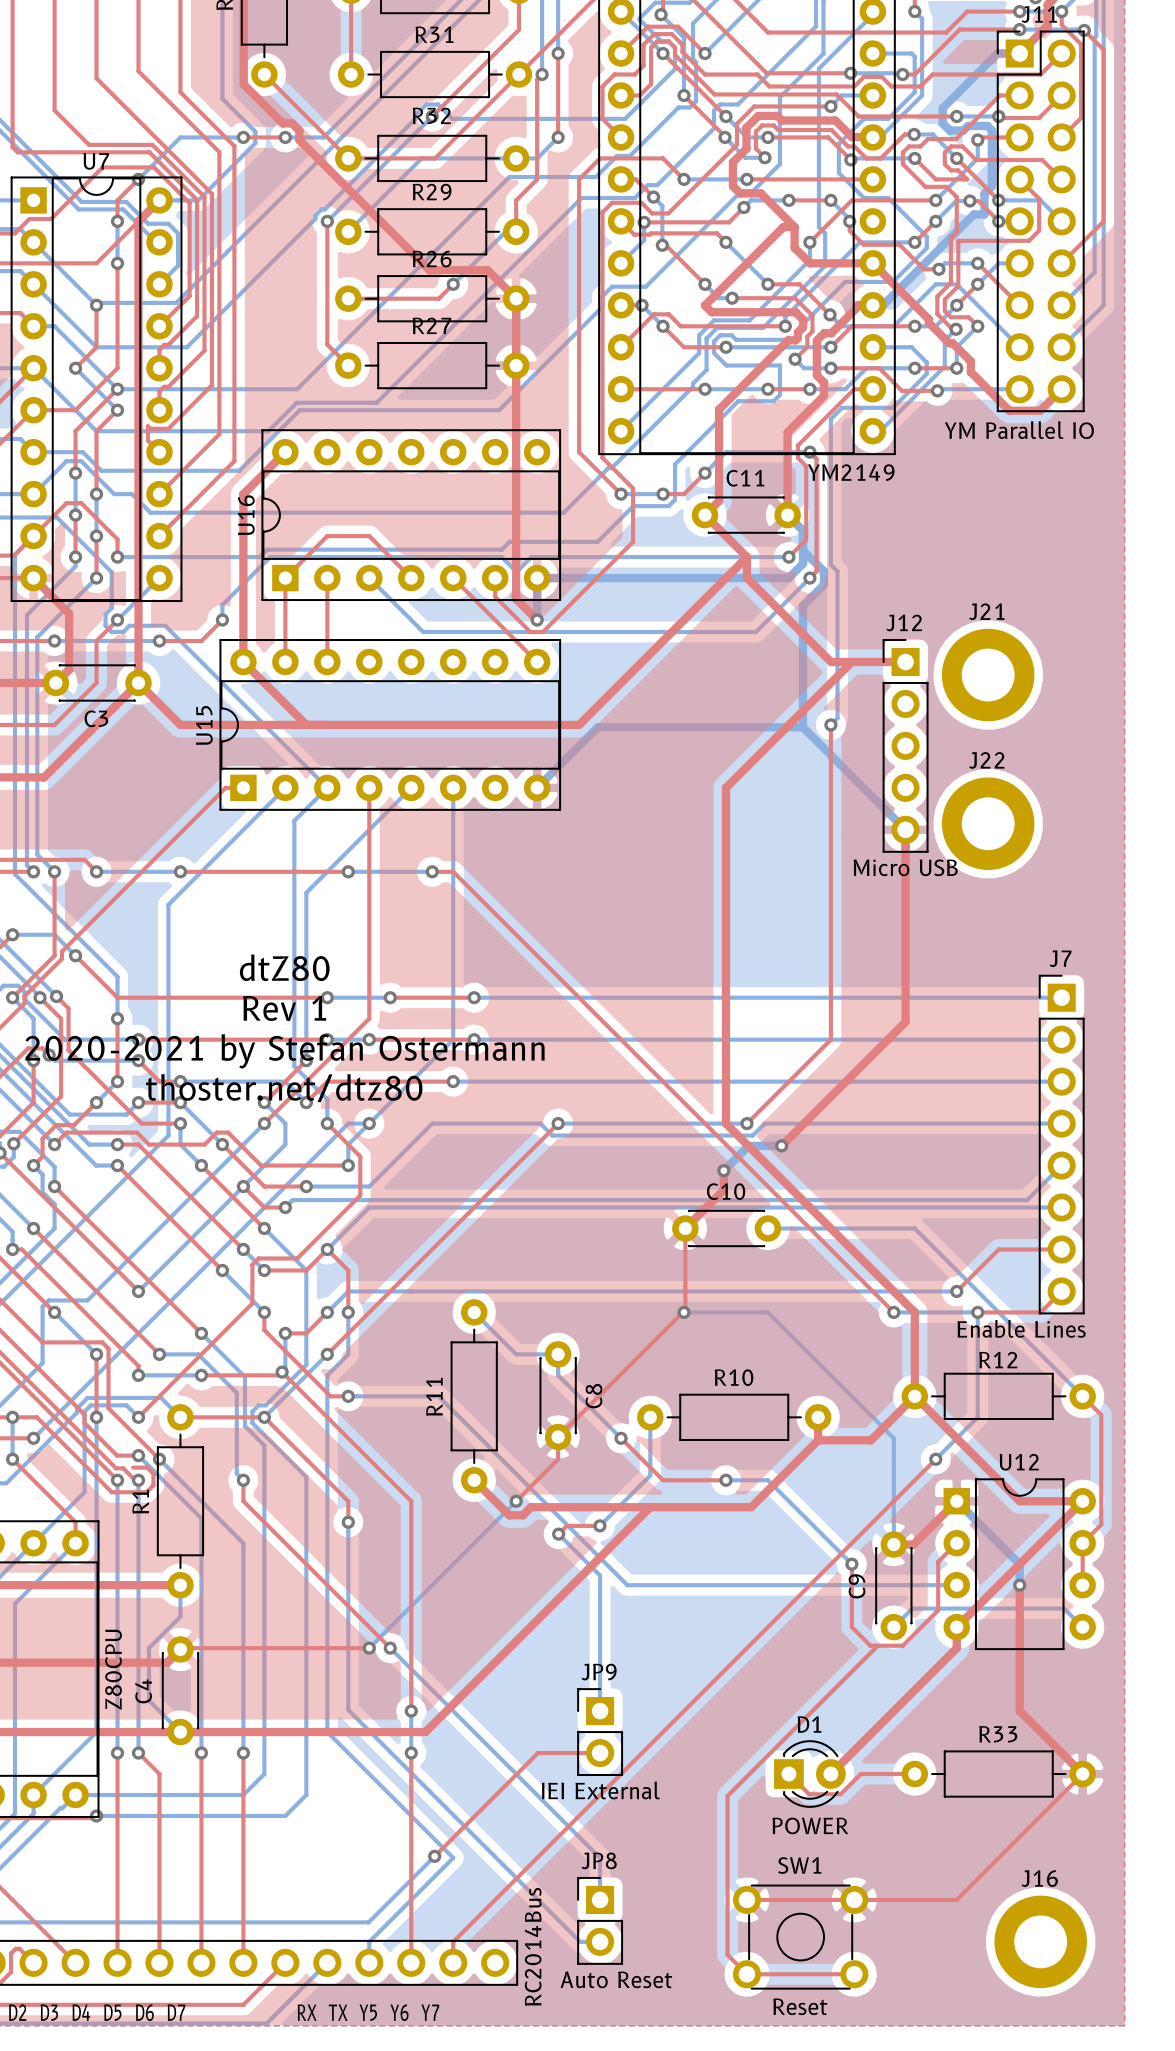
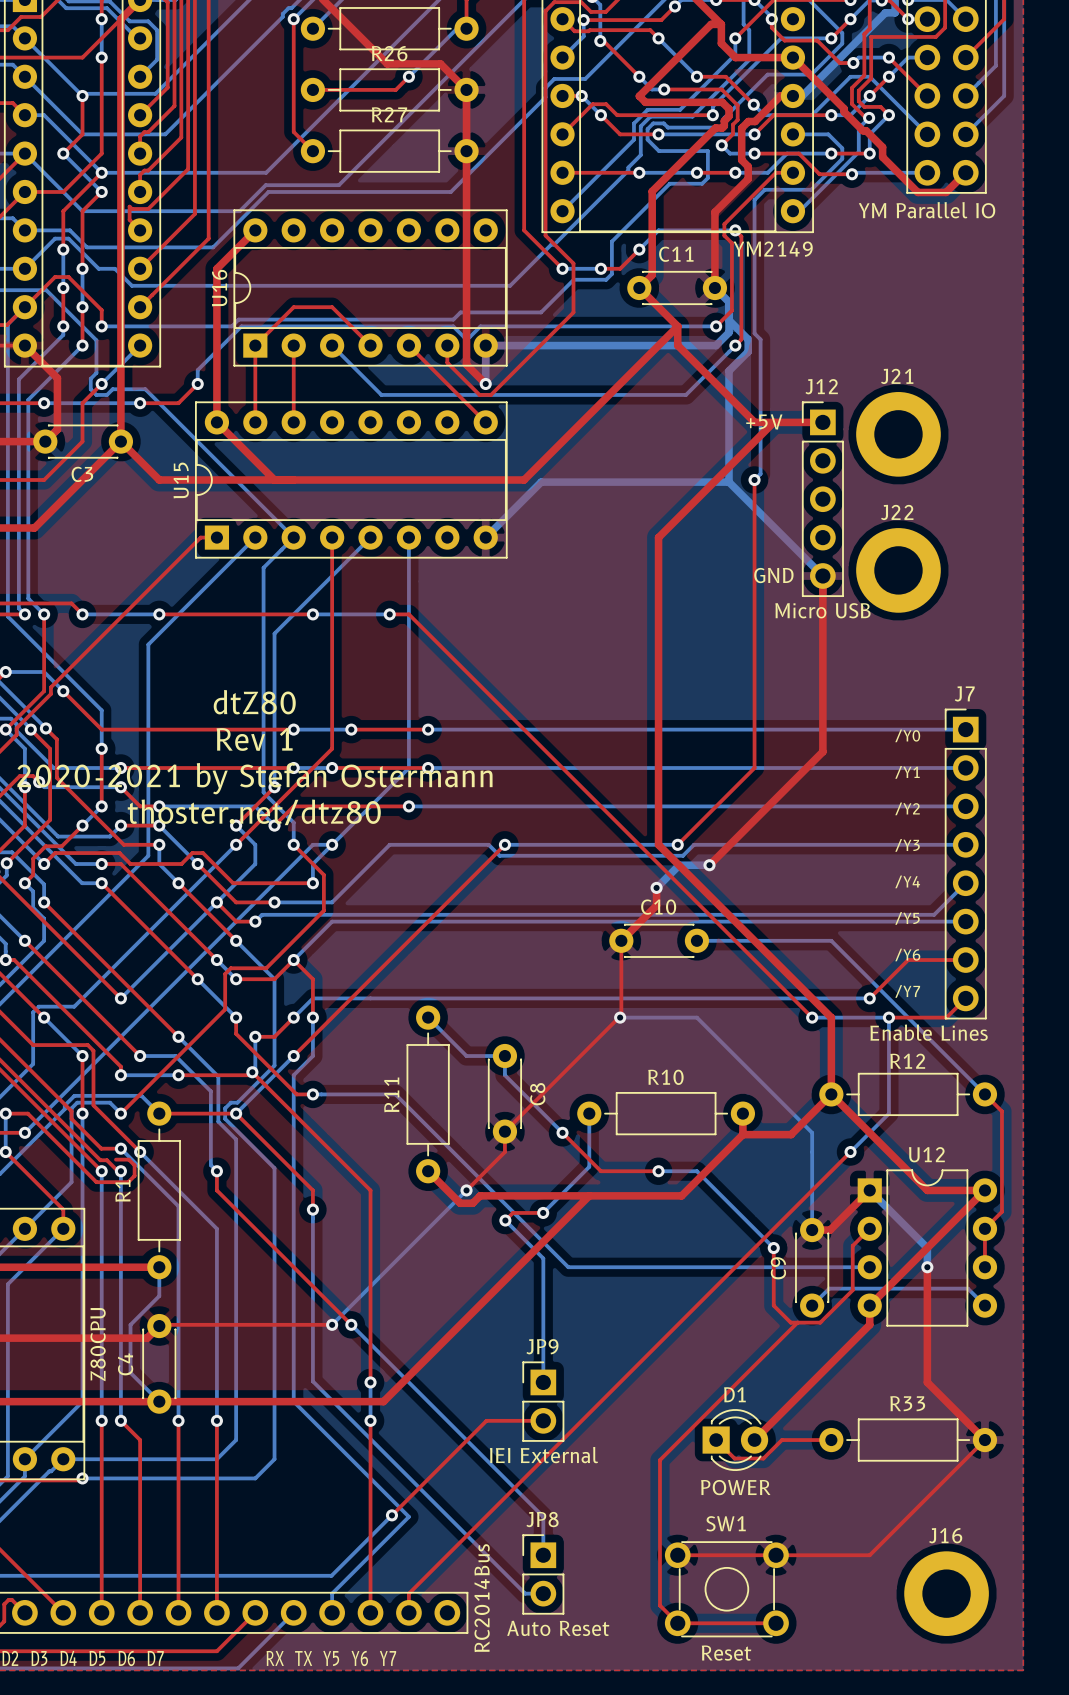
text: none -> +5V (764, 421)
text: none -> GND (773, 575)
text: none -> /Y0 (907, 735)
text: none -> /Y1 (907, 772)
text: none -> /Y2 (907, 808)
text: none -> /Y3 (907, 845)
text: none -> /Y4 (907, 881)
text: none -> /Y5 (907, 918)
text: none -> /Y6 (907, 954)
text: none -> /Y7 (907, 991)

